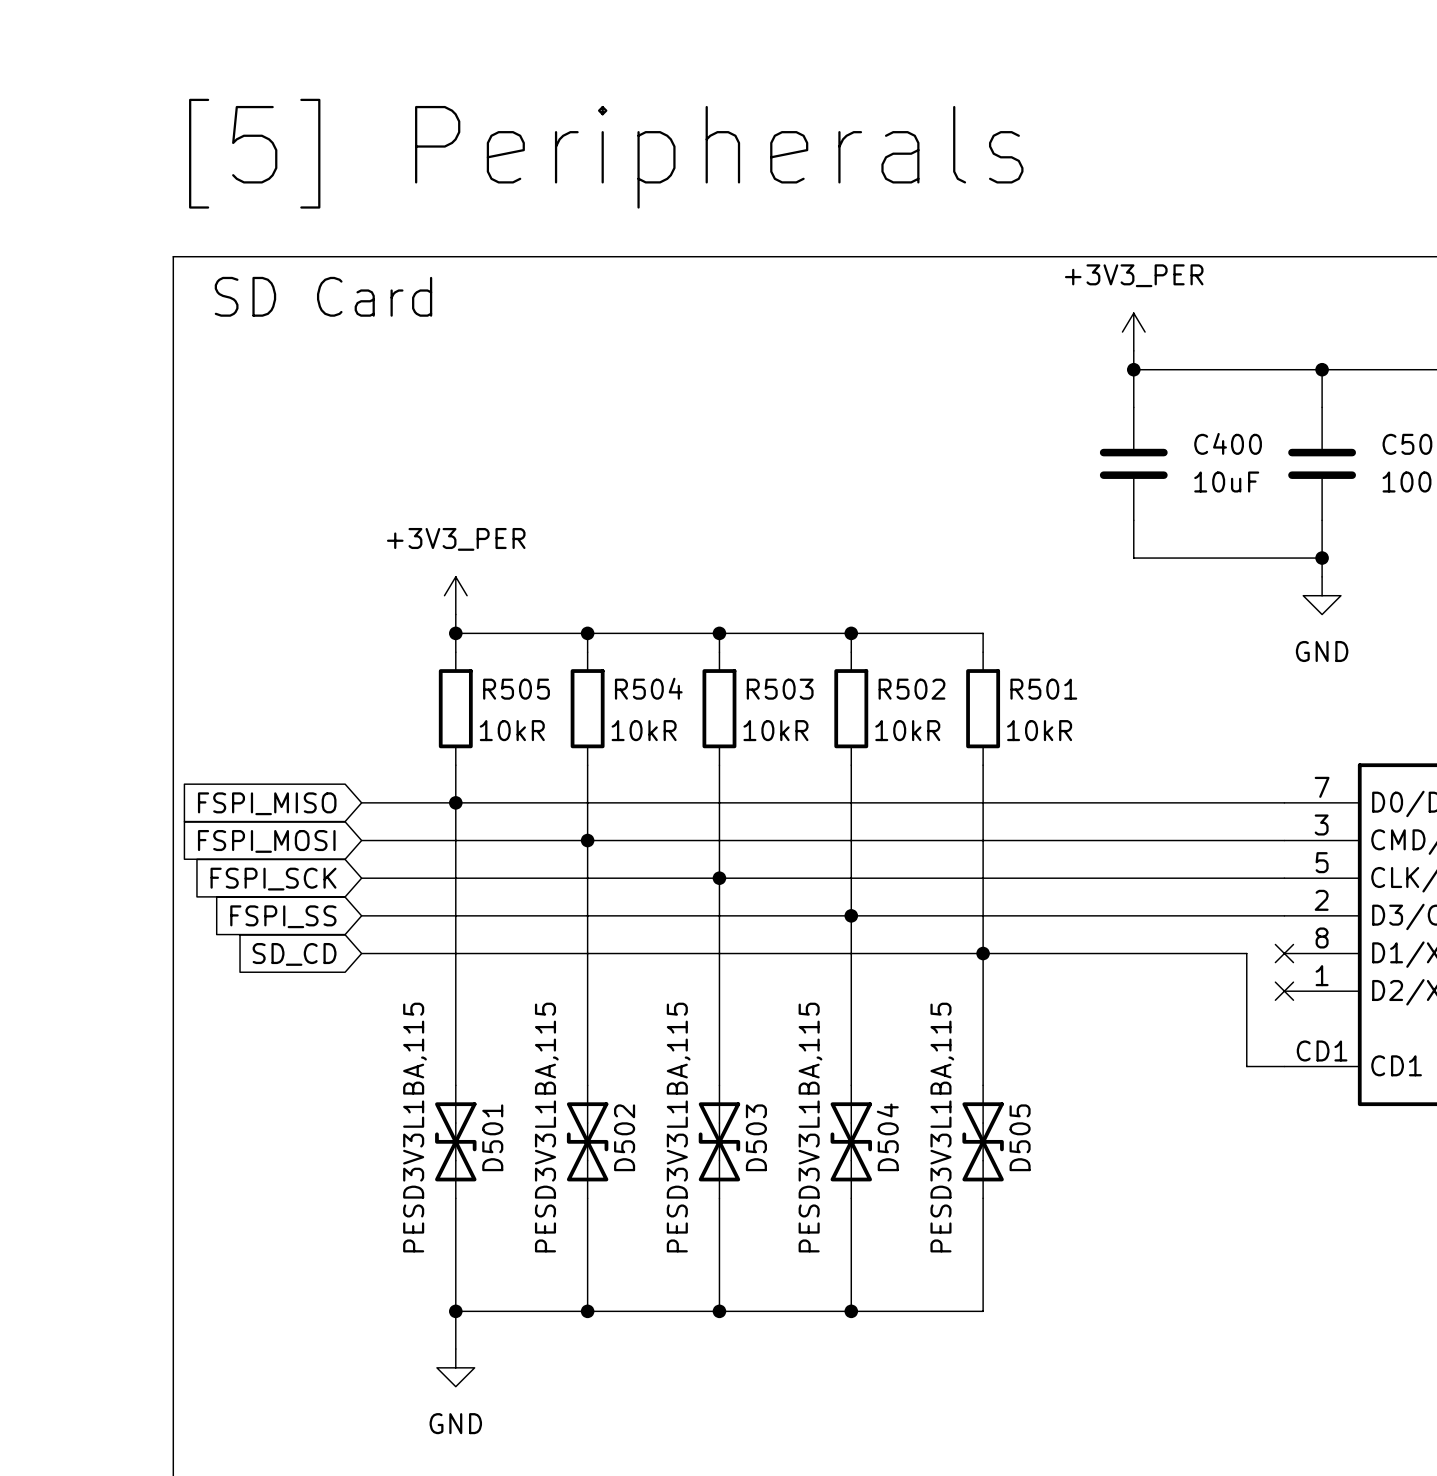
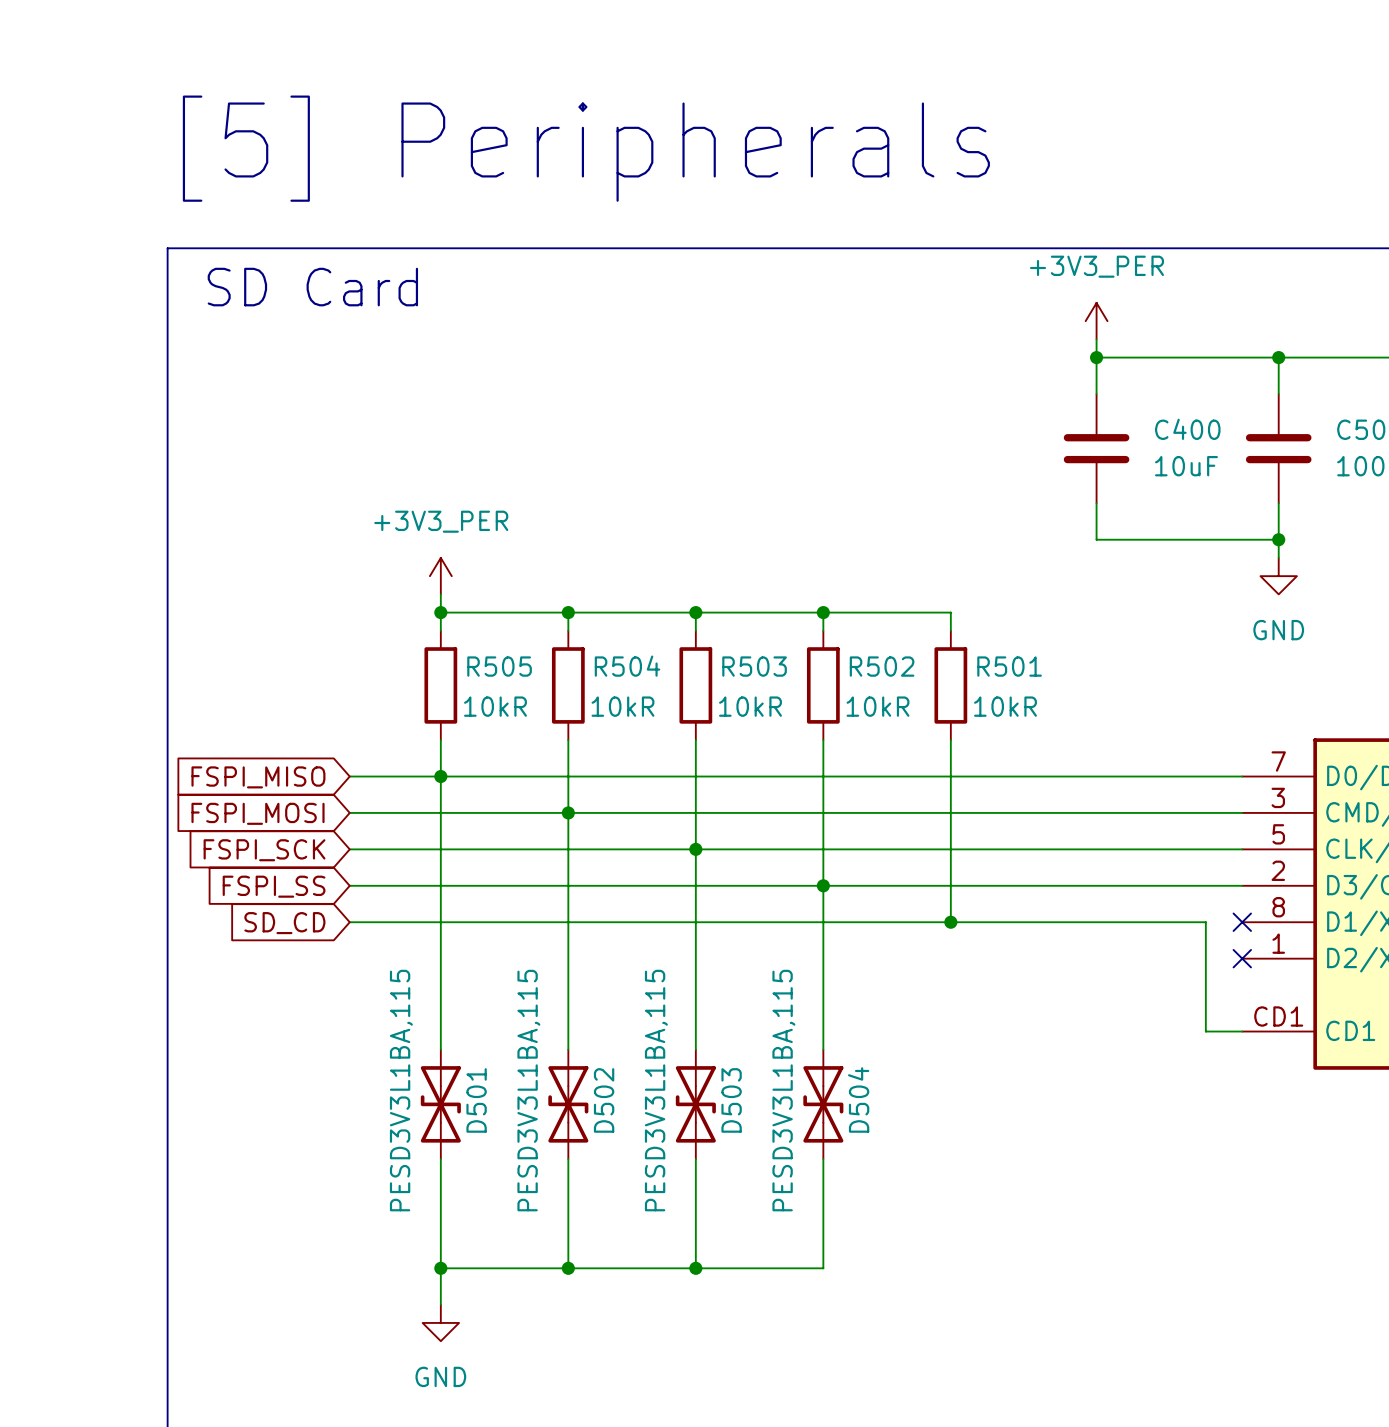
wire: (983, 953) (983, 1085) -> none
D505: PESD3V3L1BA,115 (983, 1141) -> none
wire: (983, 1198) (983, 1311) (851, 1311) -> none
junction: (851, 1311) -> none

